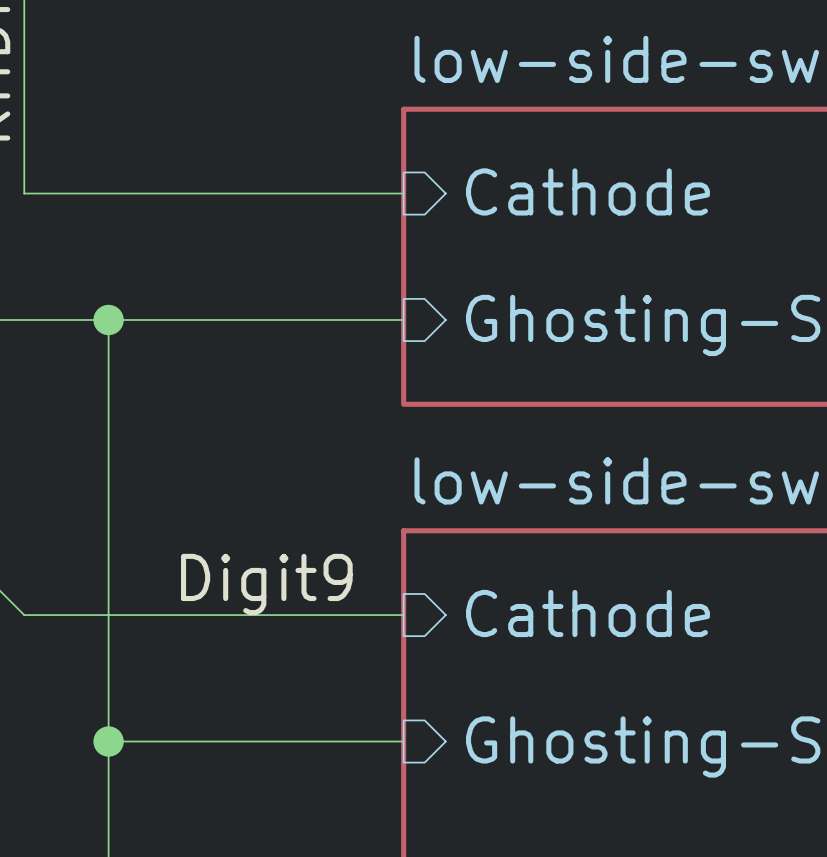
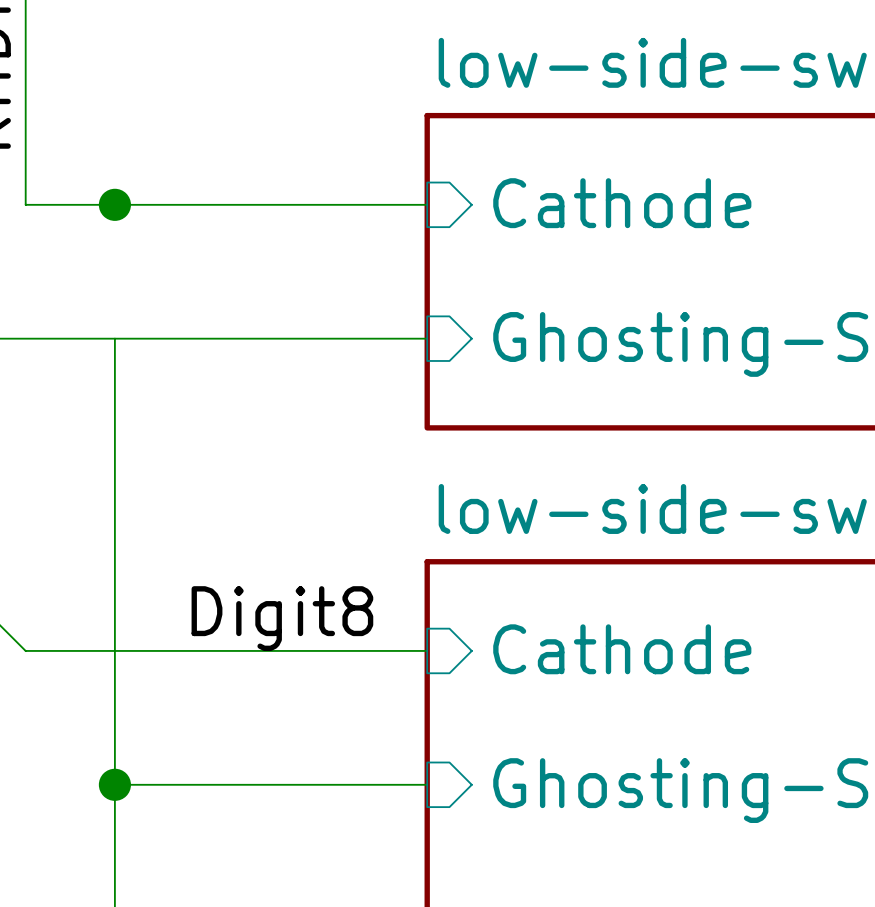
junction position: (108, 319) -> (114, 204)
label: Digit9 (266, 584) -> Digit8 (282, 618)

